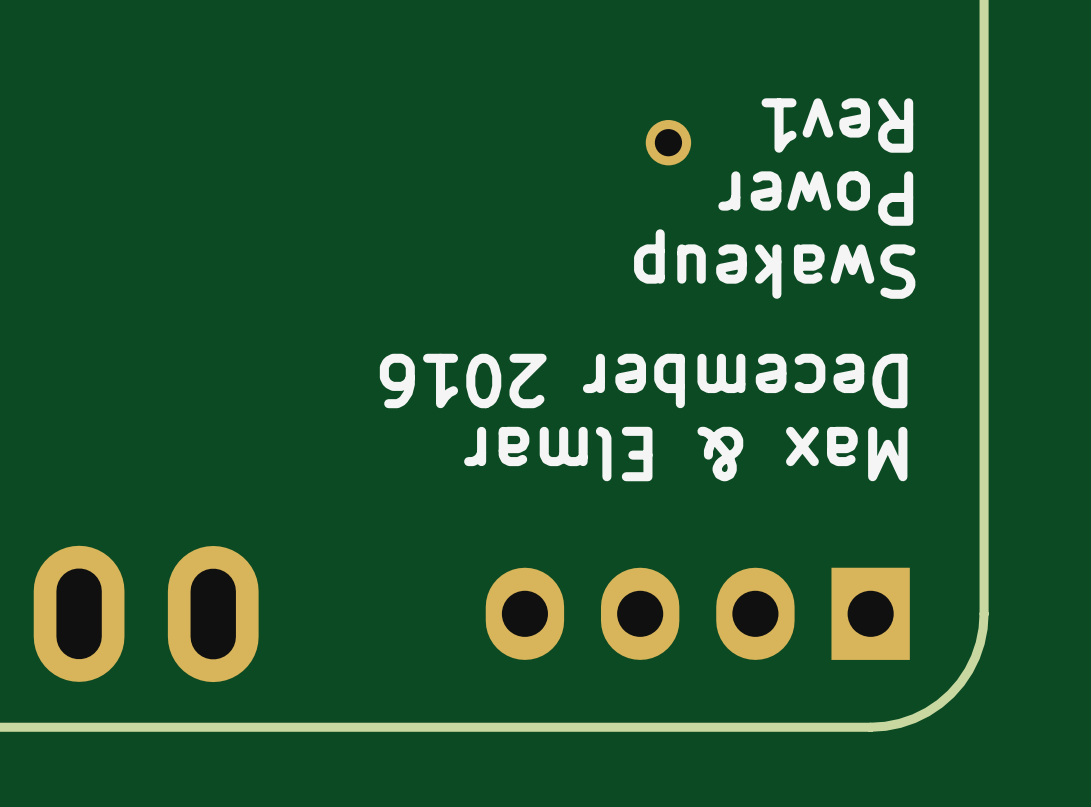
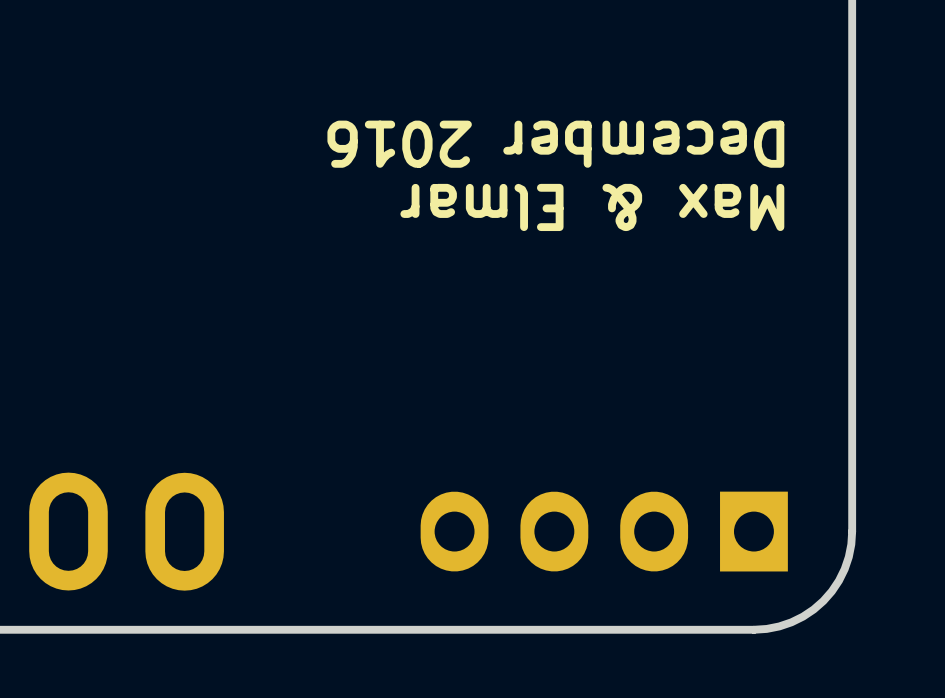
text: Rev1 (837, 125) -> none
part: (668, 142) -> none
text: Power (815, 198) -> none
text: Swakeup (774, 264) -> none
text position: December 2016 (643, 380) -> December 2016 (555, 144)
text position: Max & Elmar (685, 454) -> Max & Elmar (592, 207)

